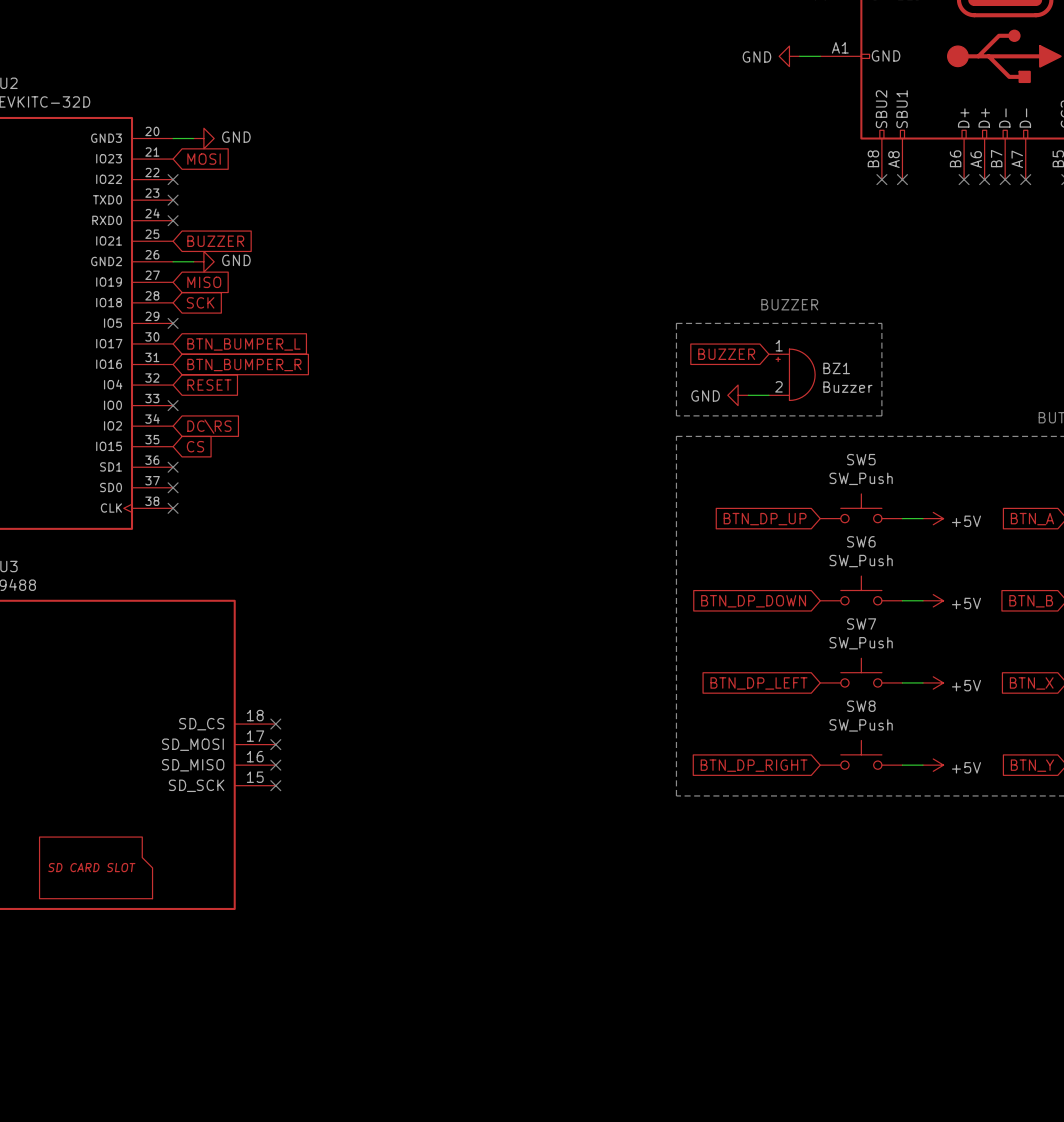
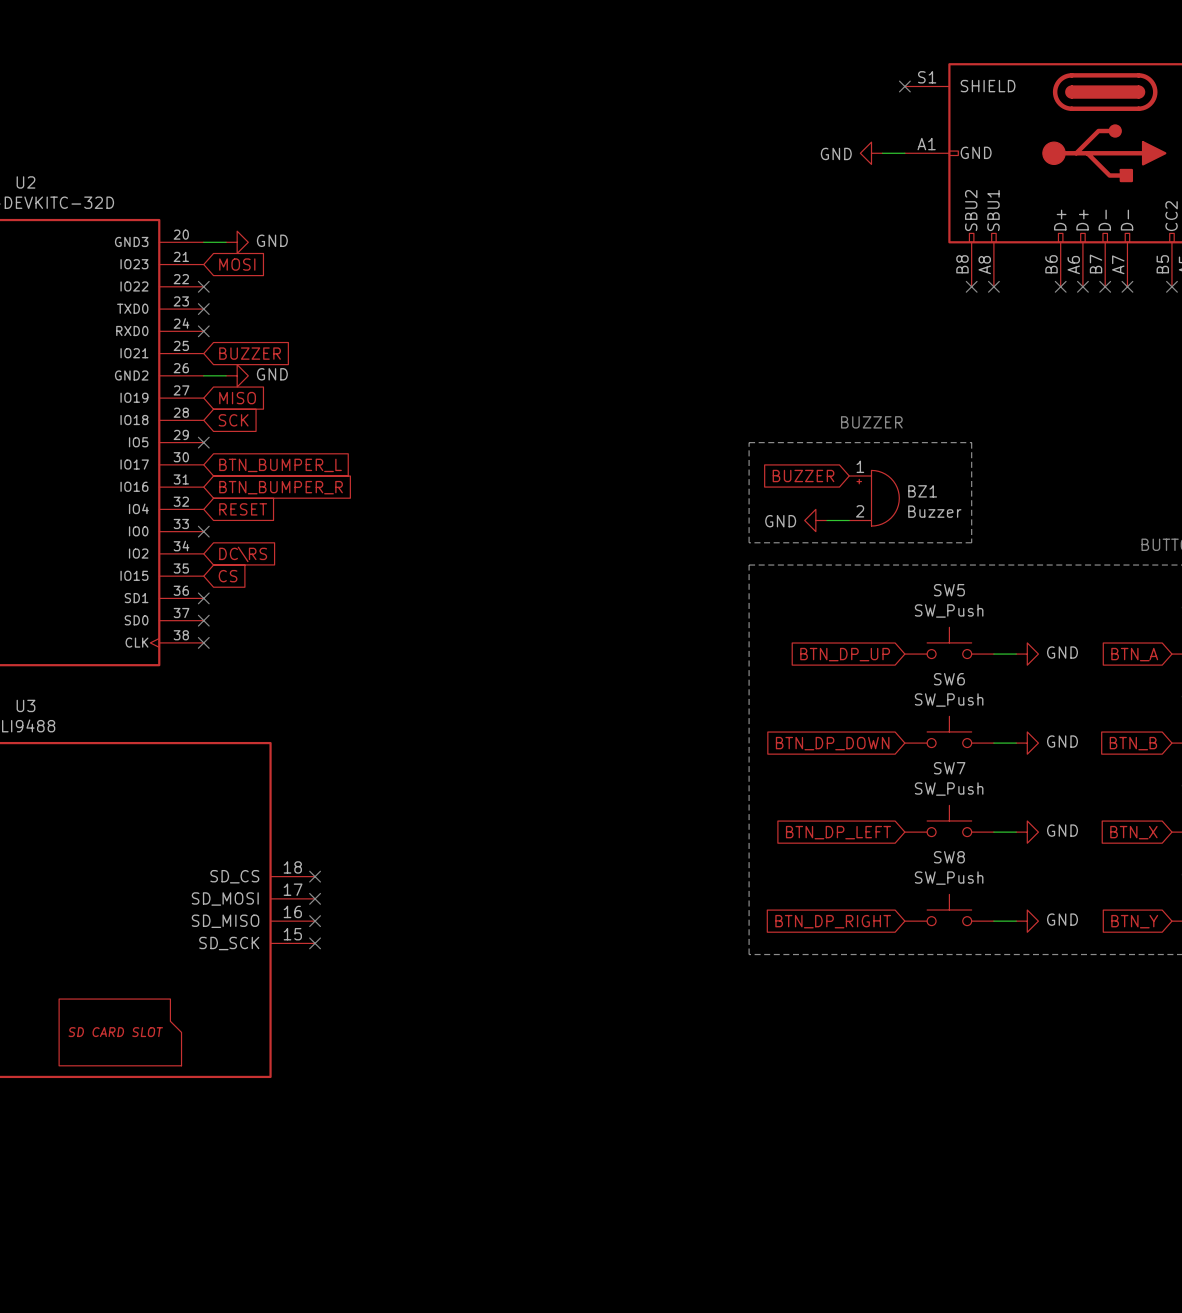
power symbol: +5V (933, 518) -> GND (1027, 654)
power symbol: +5V (933, 600) -> GND (1027, 743)
power symbol: +5V (933, 682) -> GND (1027, 832)
power symbol: +5V (933, 765) -> GND (1027, 921)

